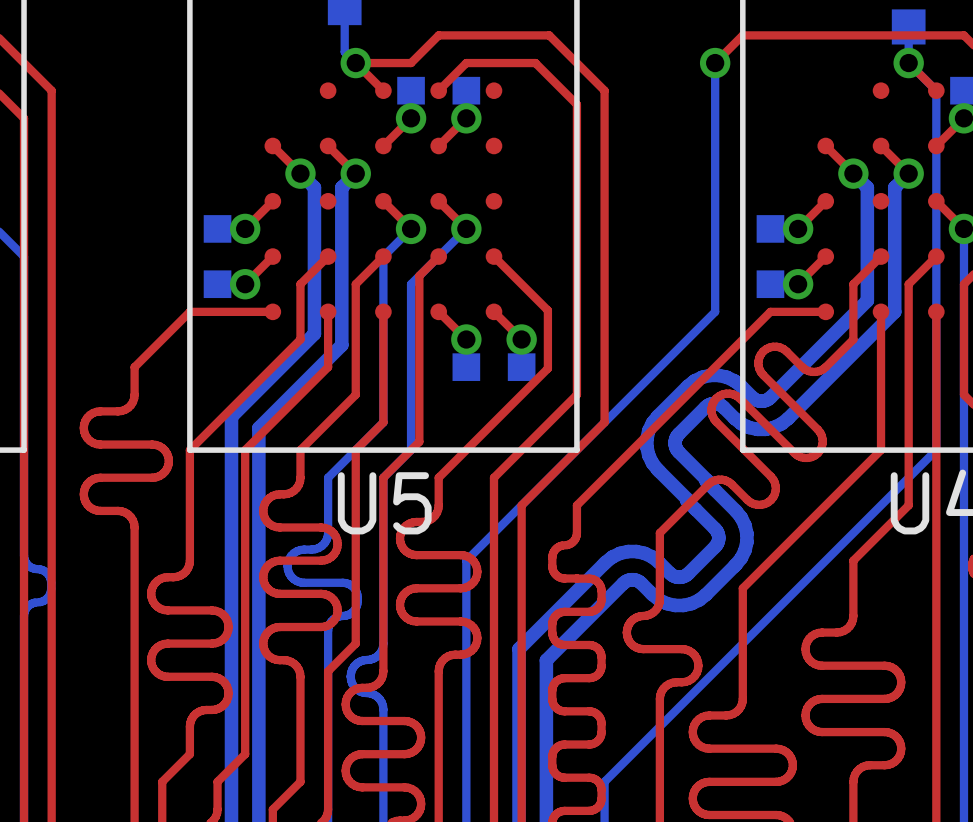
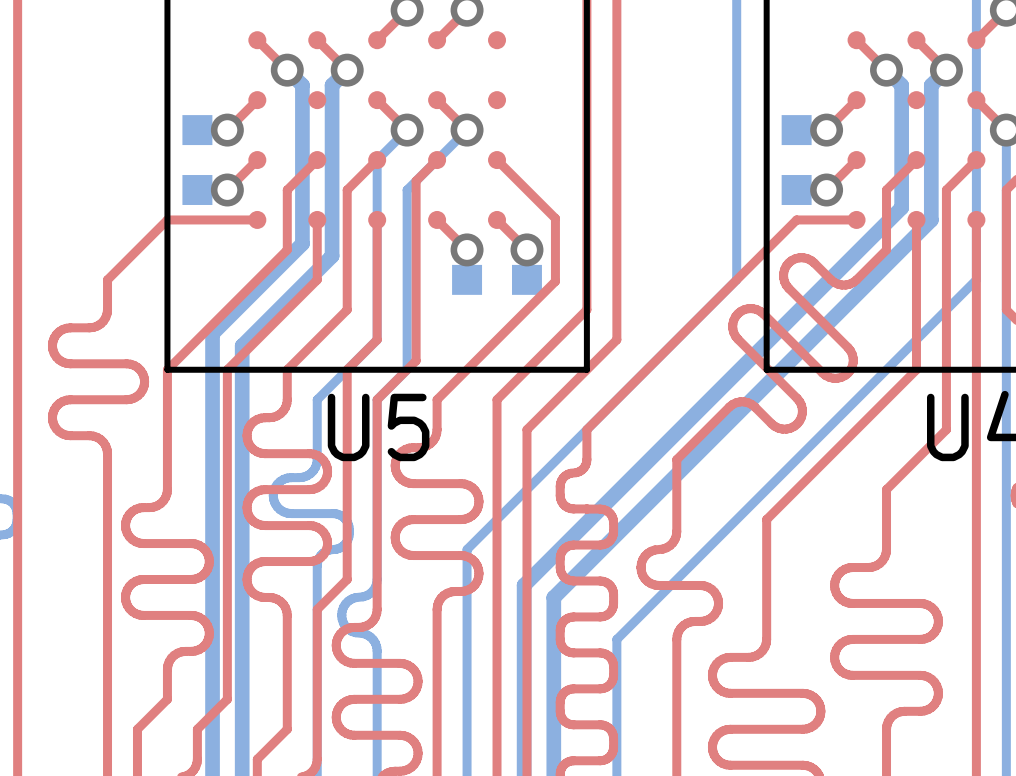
bottom track: (715, 311) (466, 560) (466, 615) -> (736, 219) (736, 279) (467, 549)
bottom track: (936, 367) (936, 450) (604, 781) -> (976, 279) (616, 639) (616, 729)
bottom track: (770, 397) (765, 400) (757, 400) (734, 380) (726, 377) (710, 375) (694, 380) (657, 416) (652, 422) (646, 438) (648, 455) (657, 469) (715, 528) (718, 536) (718, 542) (688, 573) (680, 577) (672, 575) (652, 557) (636, 551) (619, 553) (605, 562) -> (796, 312) (618, 491)
bottom track: (788, 418) (773, 427) (757, 429) (741, 423) (721, 405) (713, 403) (705, 407) (678, 434) (675, 441) (676, 449) (741, 517) (746, 533) (745, 550) (736, 564) (705, 594) (691, 603) (683, 605) (666, 603) (659, 599) (636, 580) (628, 580) (623, 583) -> (815, 335) (637, 514)

